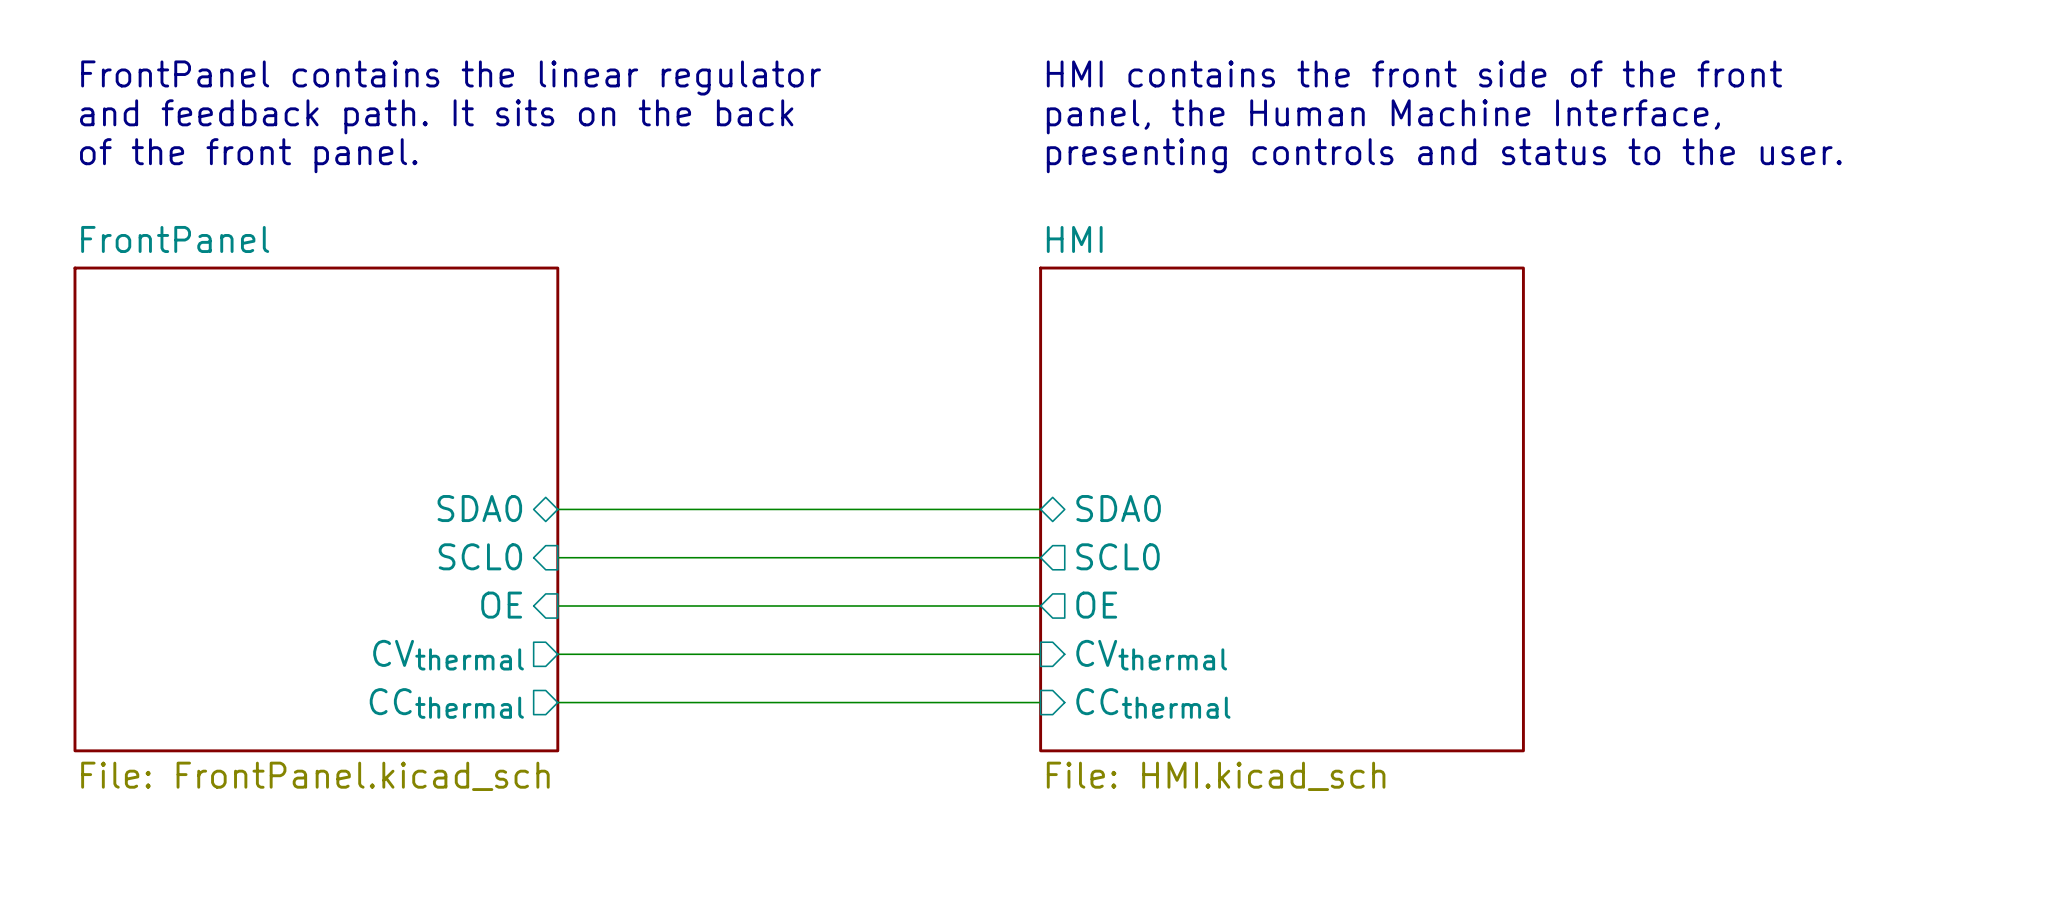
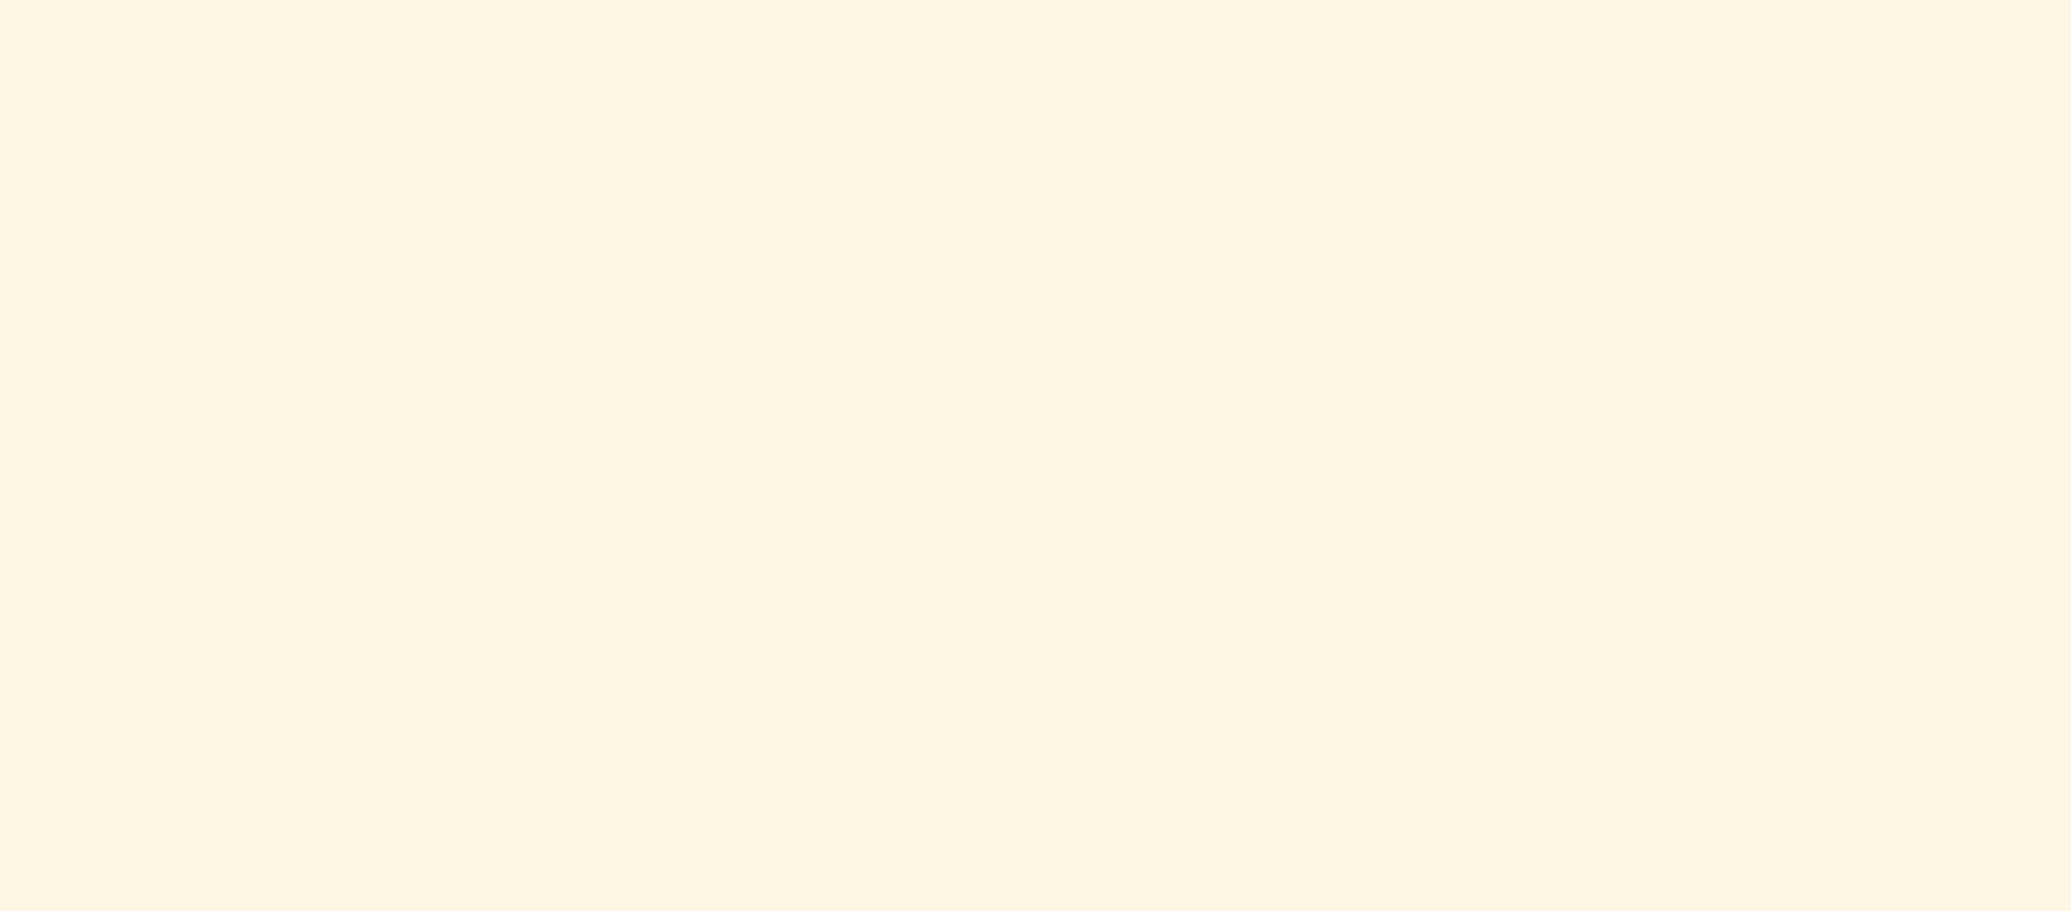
text: HMI contains the front side of the front (1414, 73) -> none
text: FrontPanel contains the linear regulator (451, 77) -> none
text: and feedback path. It sits on the back (436, 116) -> none
text: panel, the Human Machine Interface, (1383, 116) -> none
text: of the front panel. (248, 155) -> none
text: presenting controls and status to the user. (1444, 155) -> none
sheet pin: SDA0 (479, 508) -> none
sheet pin: SDA0 (1118, 508) -> none
sheet FrontPanel: File: FrontPanel.kicad_sch (316, 509) -> none
wire: (557, 509) (1040, 509) -> none
sheet HMI: File: HMI.kicad_sch (1282, 509) -> none
sheet pin: SCL0 (480, 556) -> none
sheet pin: SCL0 (1118, 556) -> none
wire: (557, 557) (1040, 557) -> none
sheet pin: OE (501, 605) -> none
sheet pin: OE (1096, 605) -> none
wire: (557, 606) (1040, 606) -> none
wire: (557, 654) (1040, 654) -> none
sheet pin: CVthermal (448, 655) -> none
sheet pin: CVthermal (1151, 655) -> none
wire: (557, 702) (1040, 702) -> none
sheet pin: CCthermal (446, 703) -> none
sheet pin: CCthermal (1153, 703) -> none

